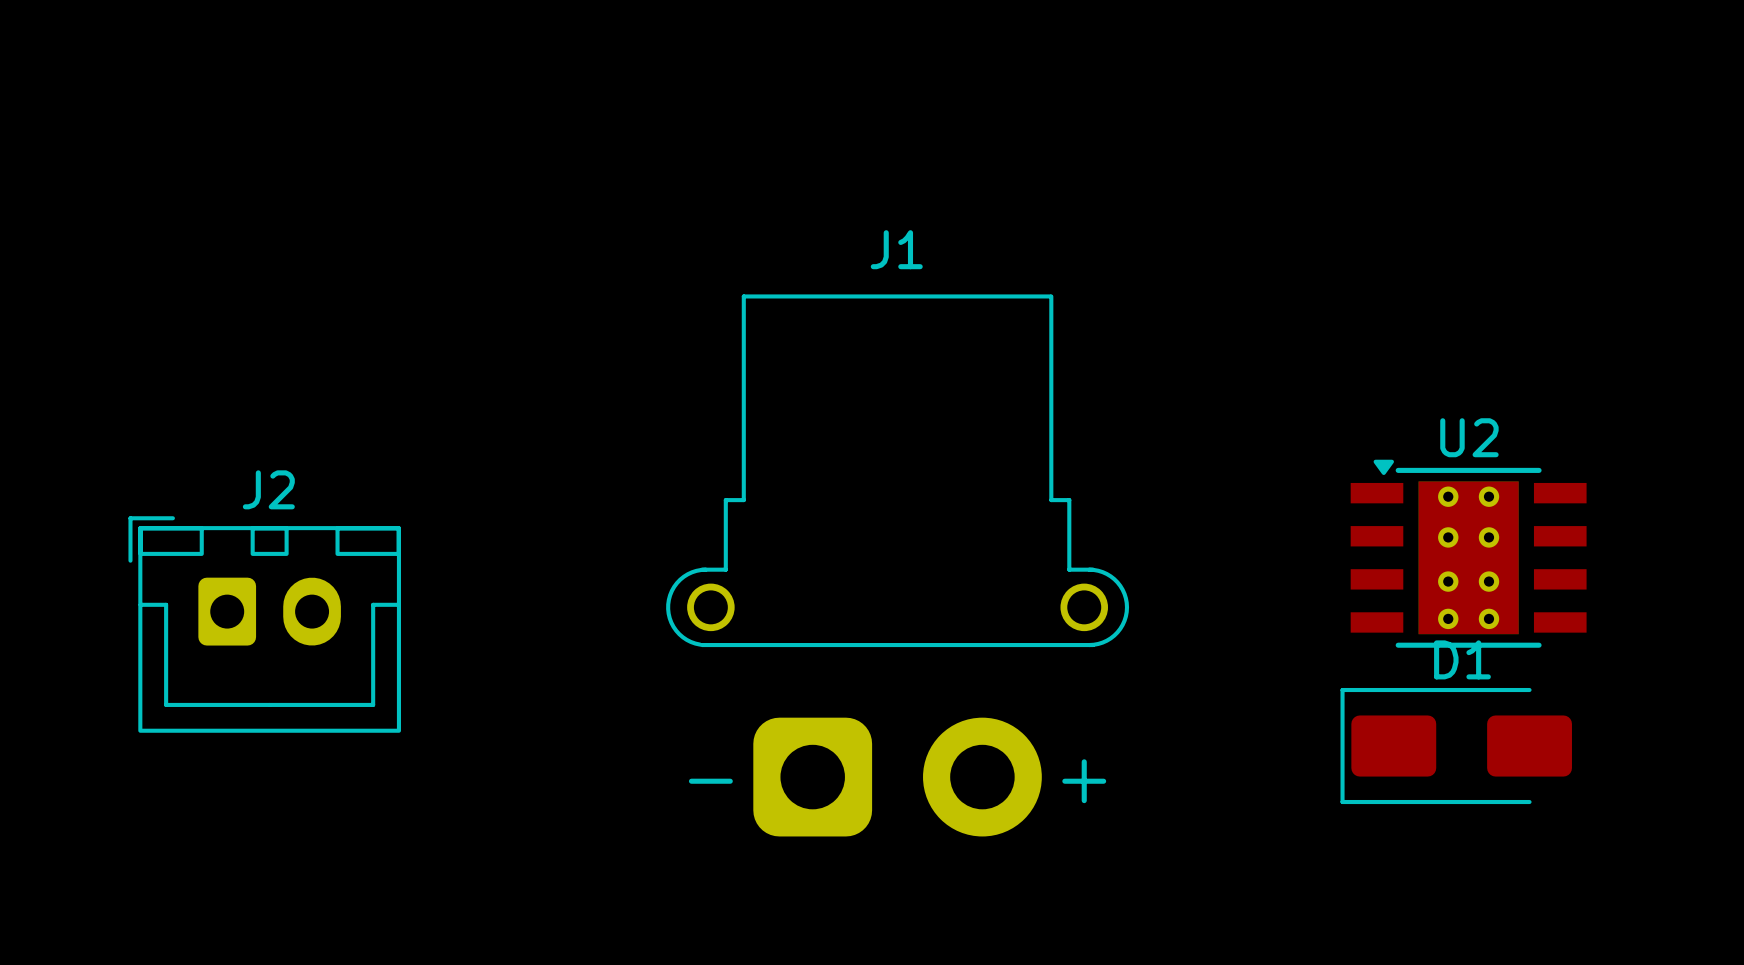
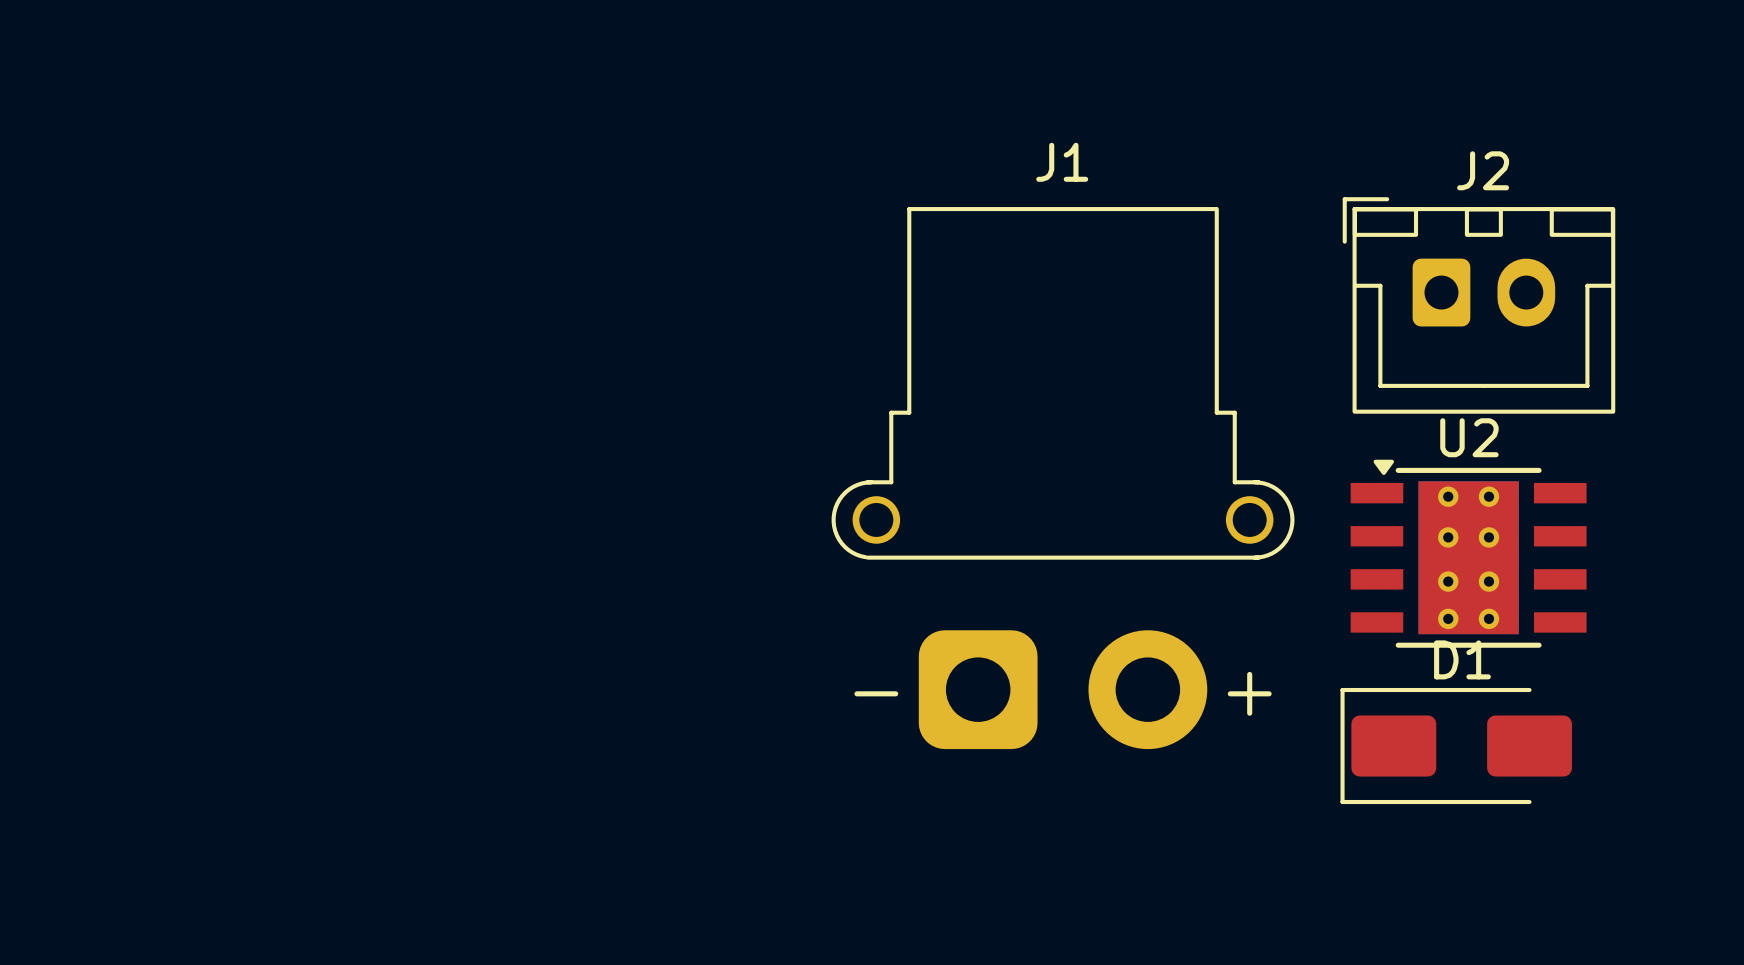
J1 position: (897, 565) -> (1063, 478)
J2 position: (264, 624) -> (1478, 305)

